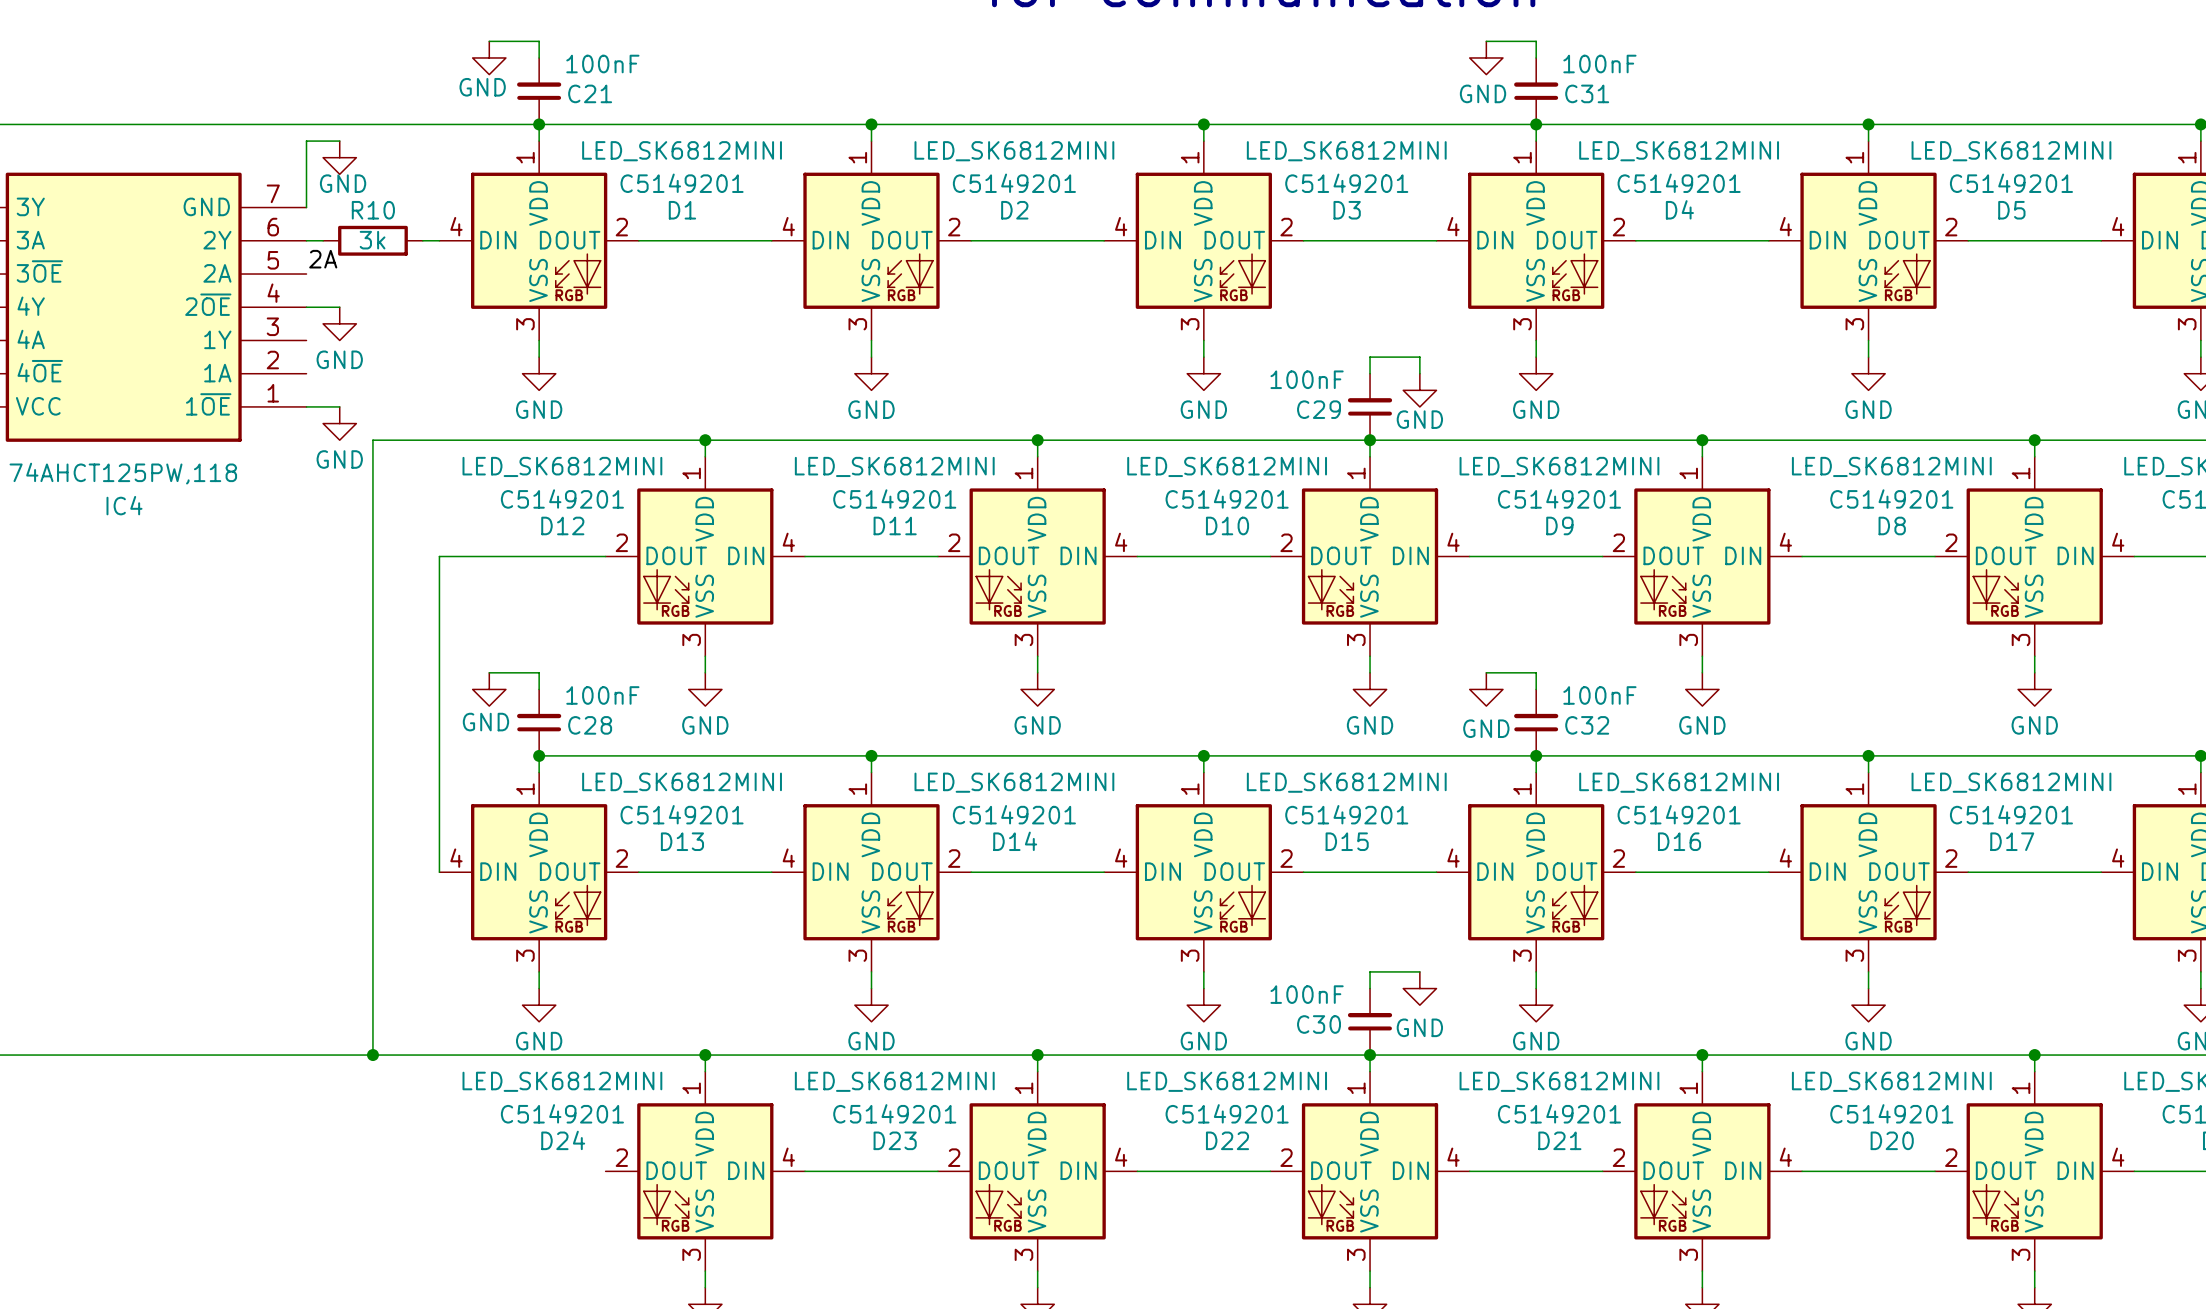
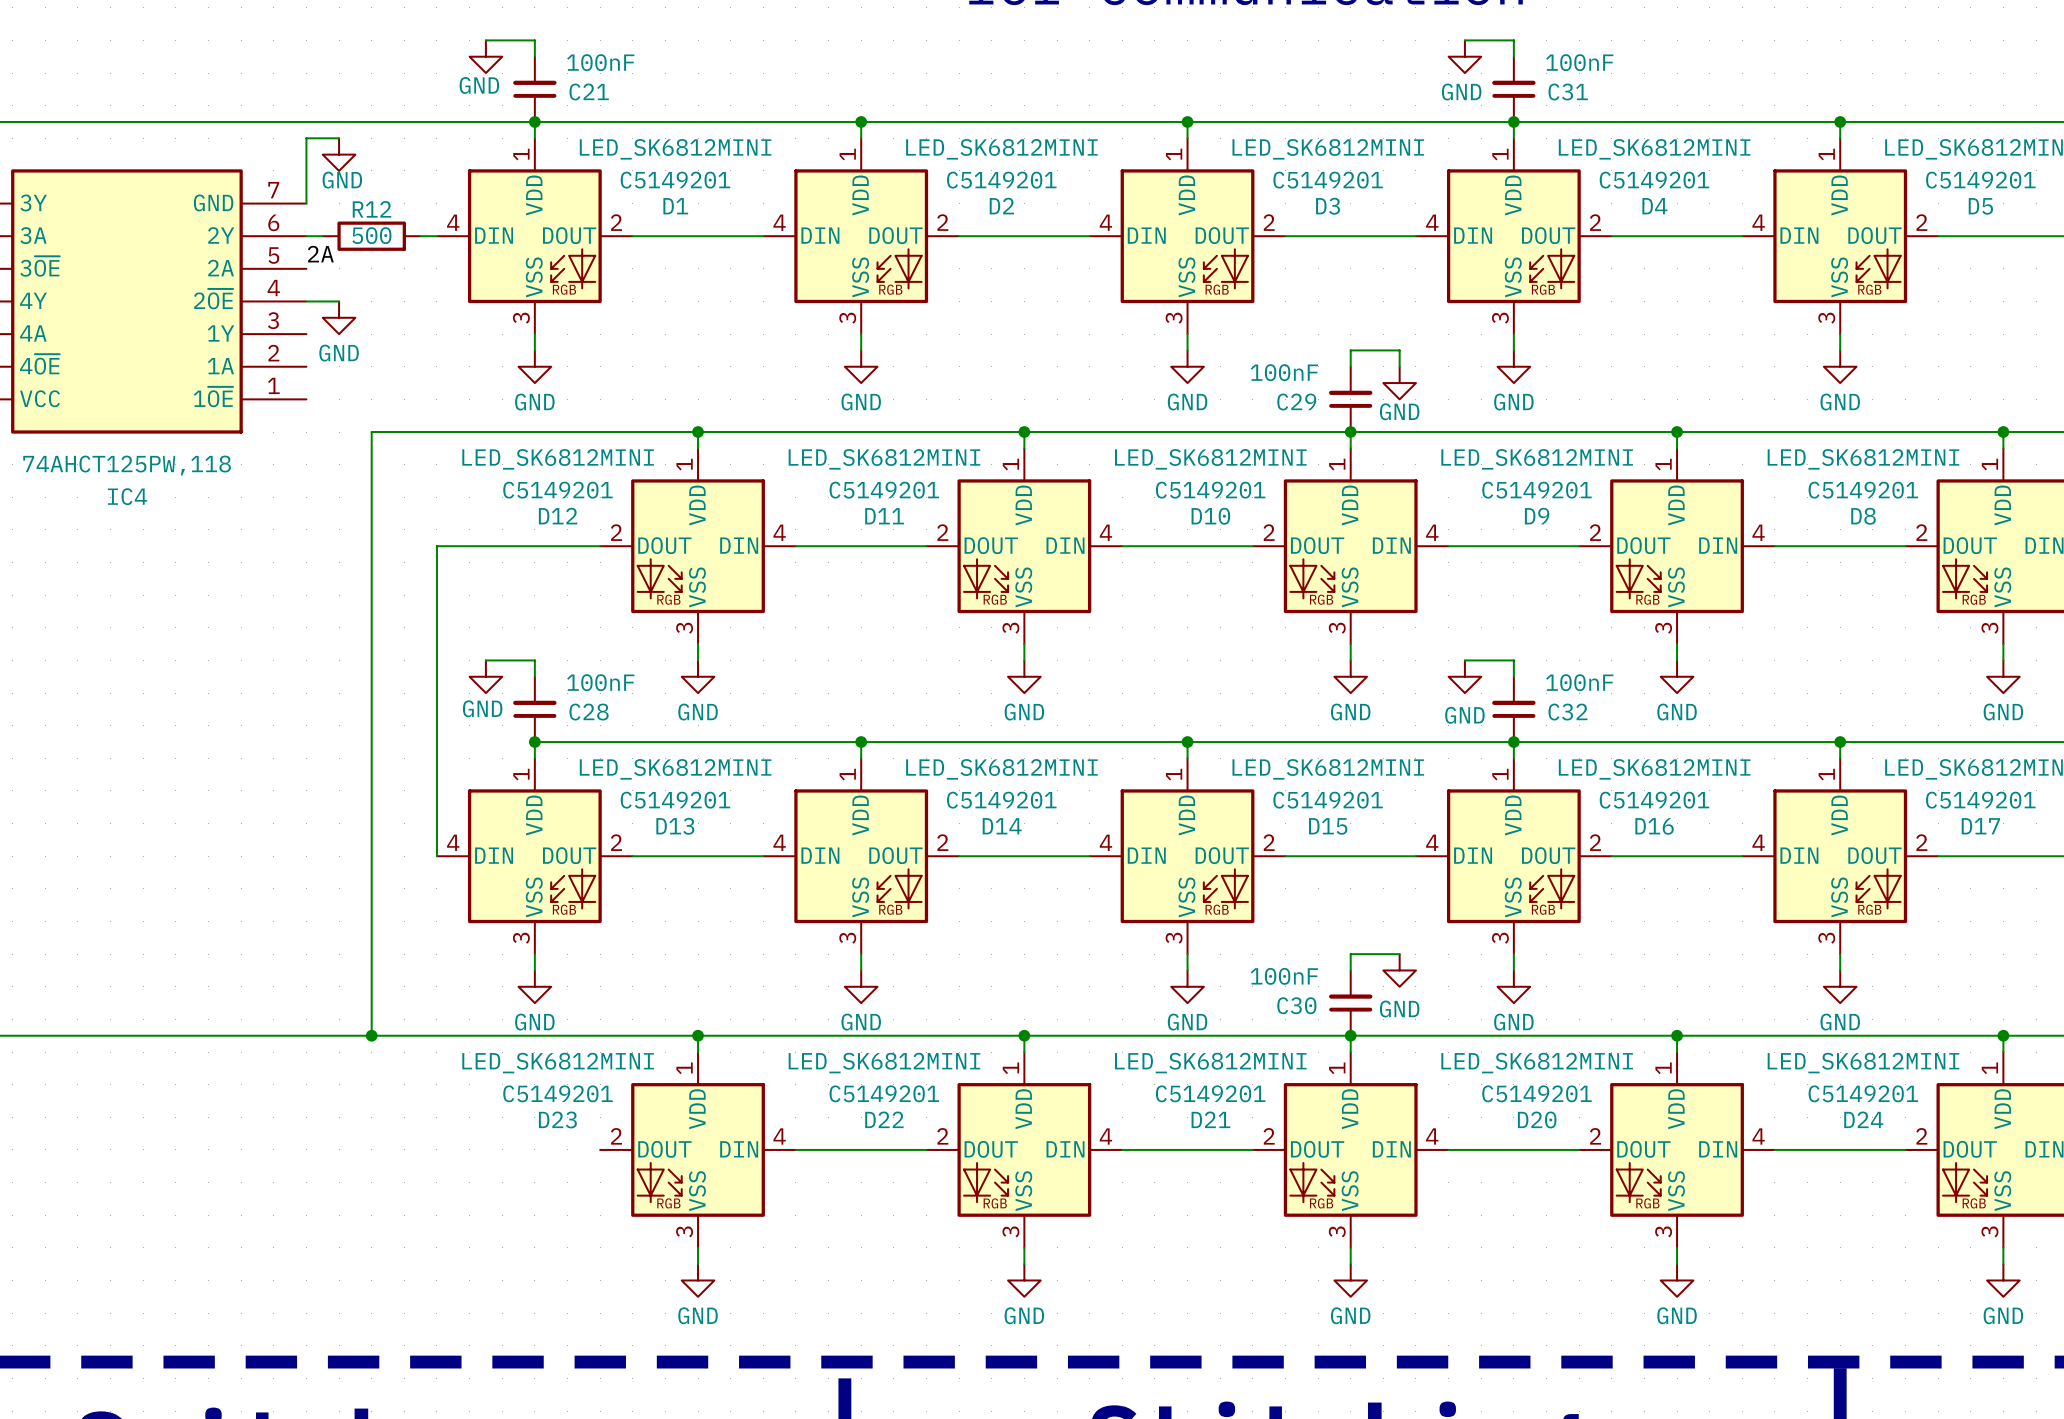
R10 name: R10 (373, 210) -> R12 (372, 209)
R10 value: 3k (372, 240) -> 500 (371, 235)
wire: (306, 406) (339, 406) -> none
power symbol: GND (339, 423) -> none
D24 name: D24 (563, 1140) -> D23 (557, 1119)
D23 name: D23 (895, 1140) -> D22 (884, 1119)
D22 name: D22 (1227, 1140) -> D21 (1210, 1119)
D21 name: D21 (1559, 1140) -> D20 (1537, 1119)
D20 name: D20 (1892, 1140) -> D24 (1863, 1119)

